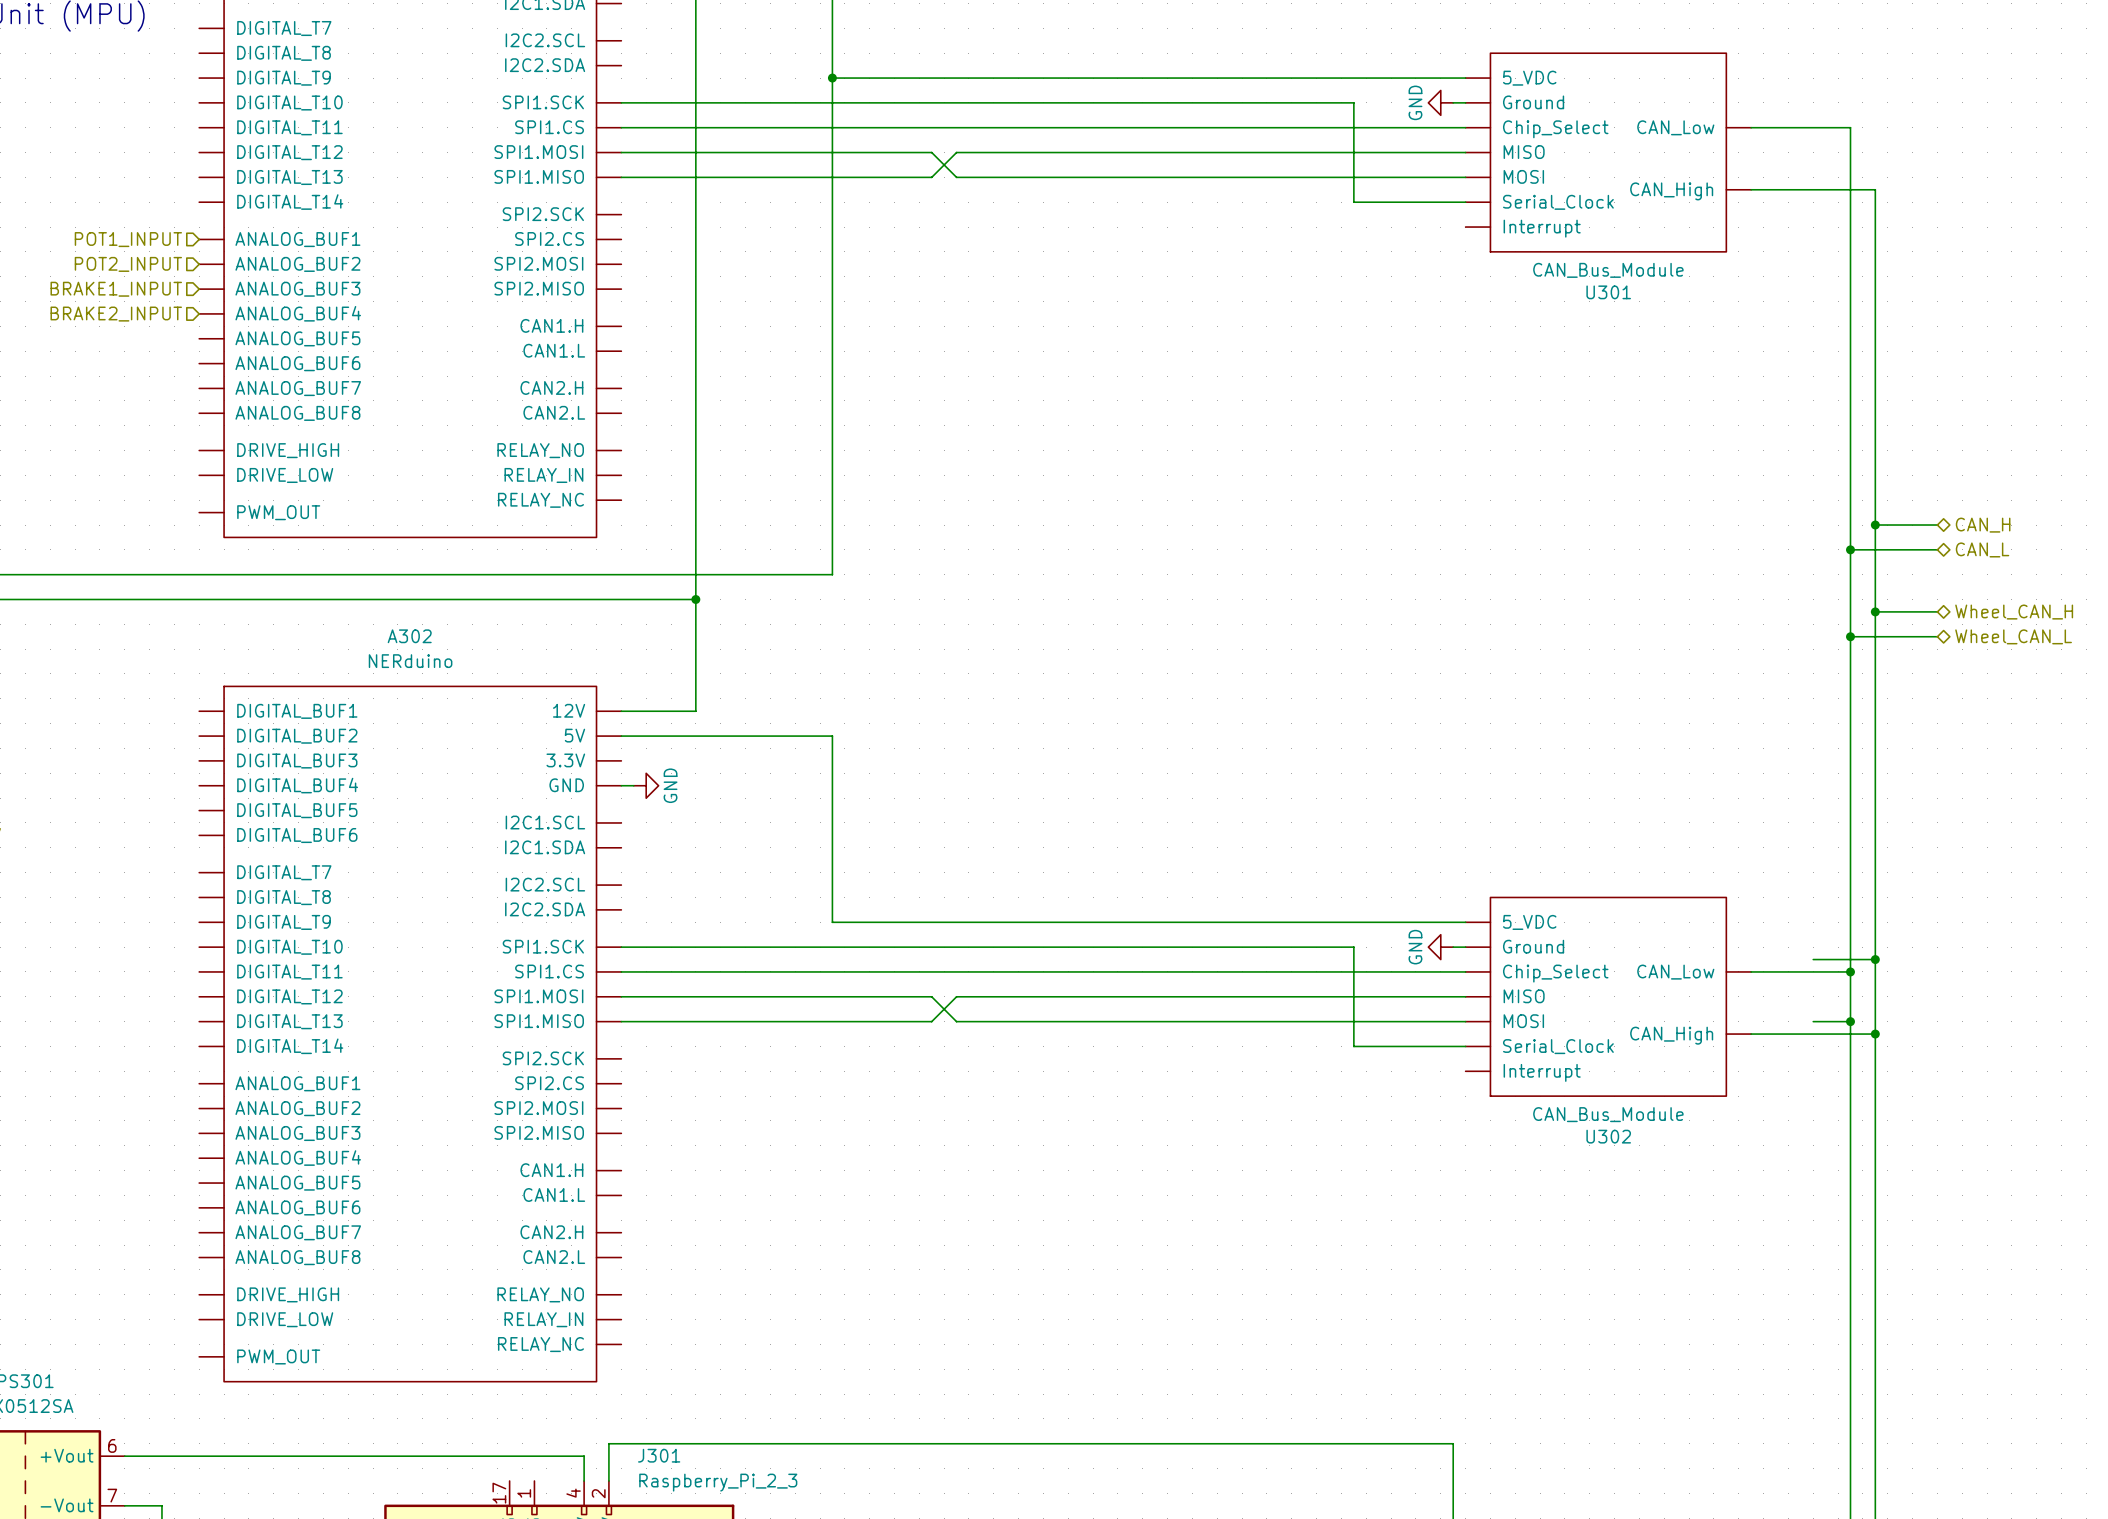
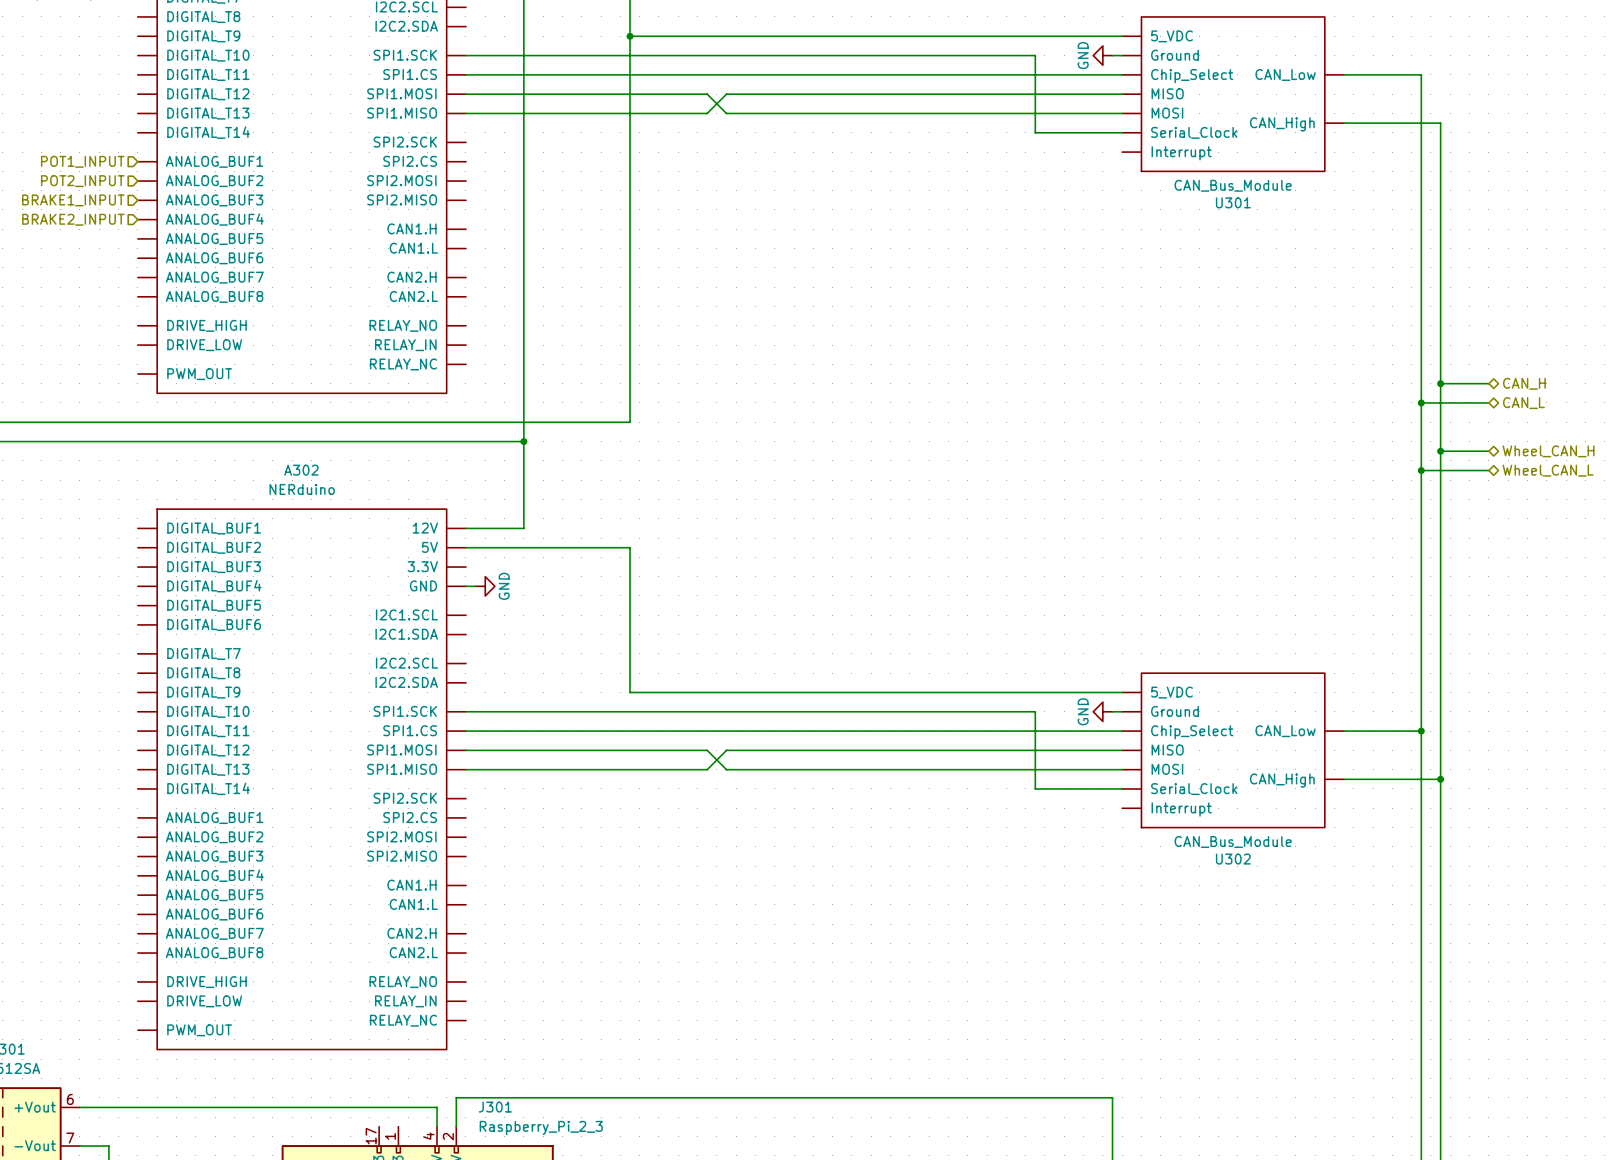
wire: (1813, 959) (1875, 959) -> none
junction: (1875, 959) -> none
wire: (1813, 1021) (1850, 1021) -> none
junction: (1850, 1021) -> none

